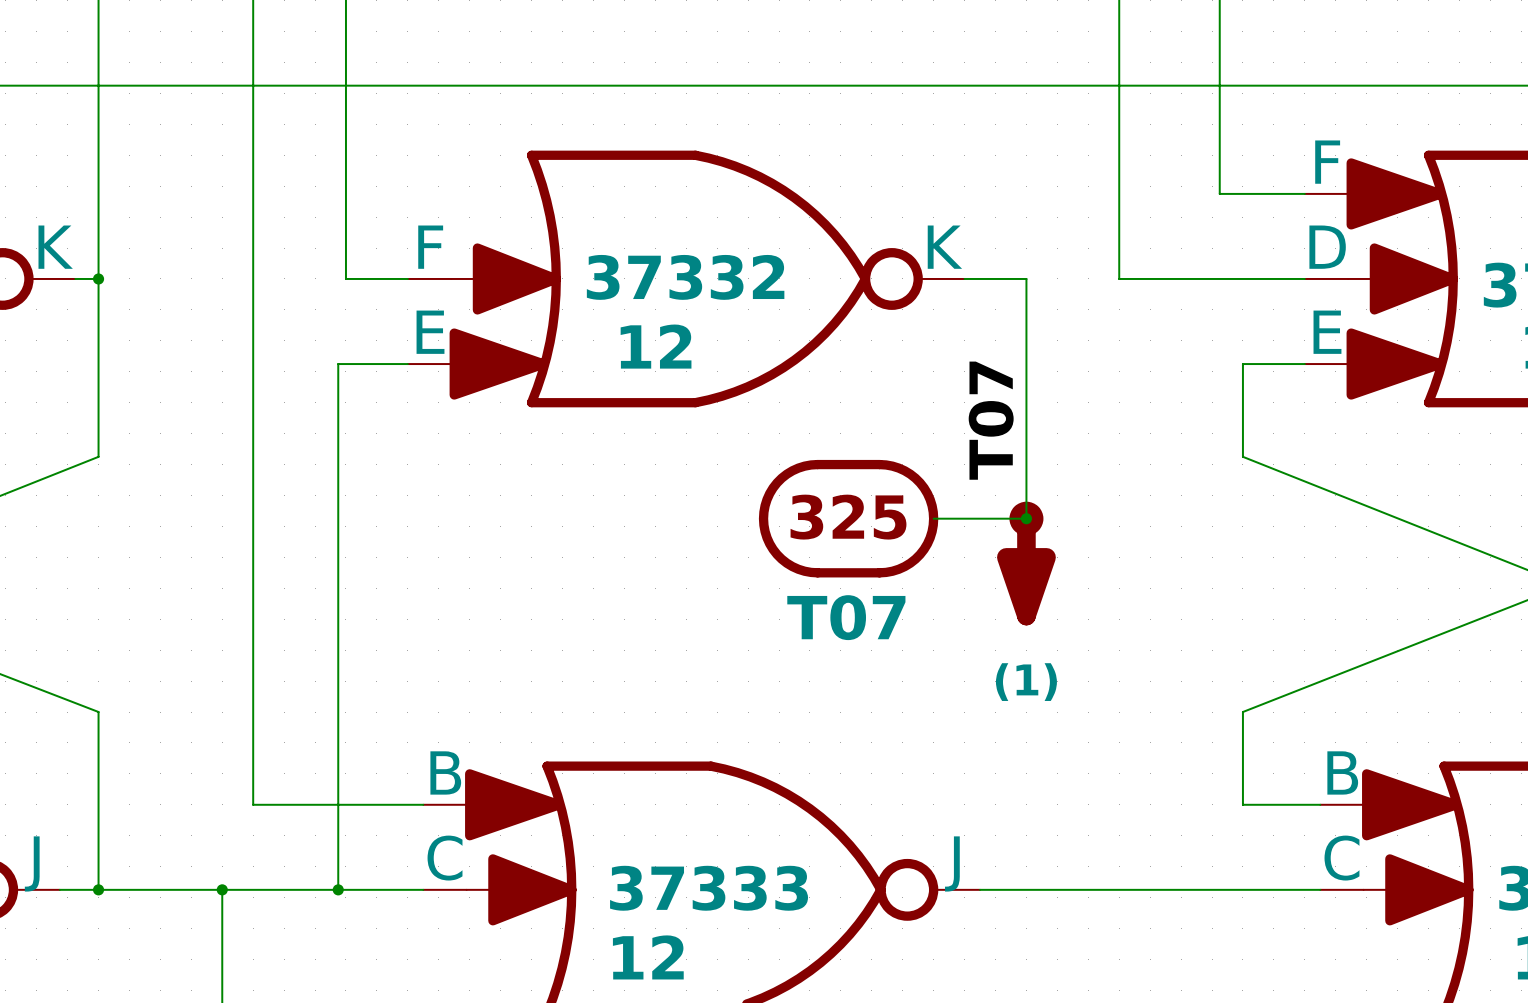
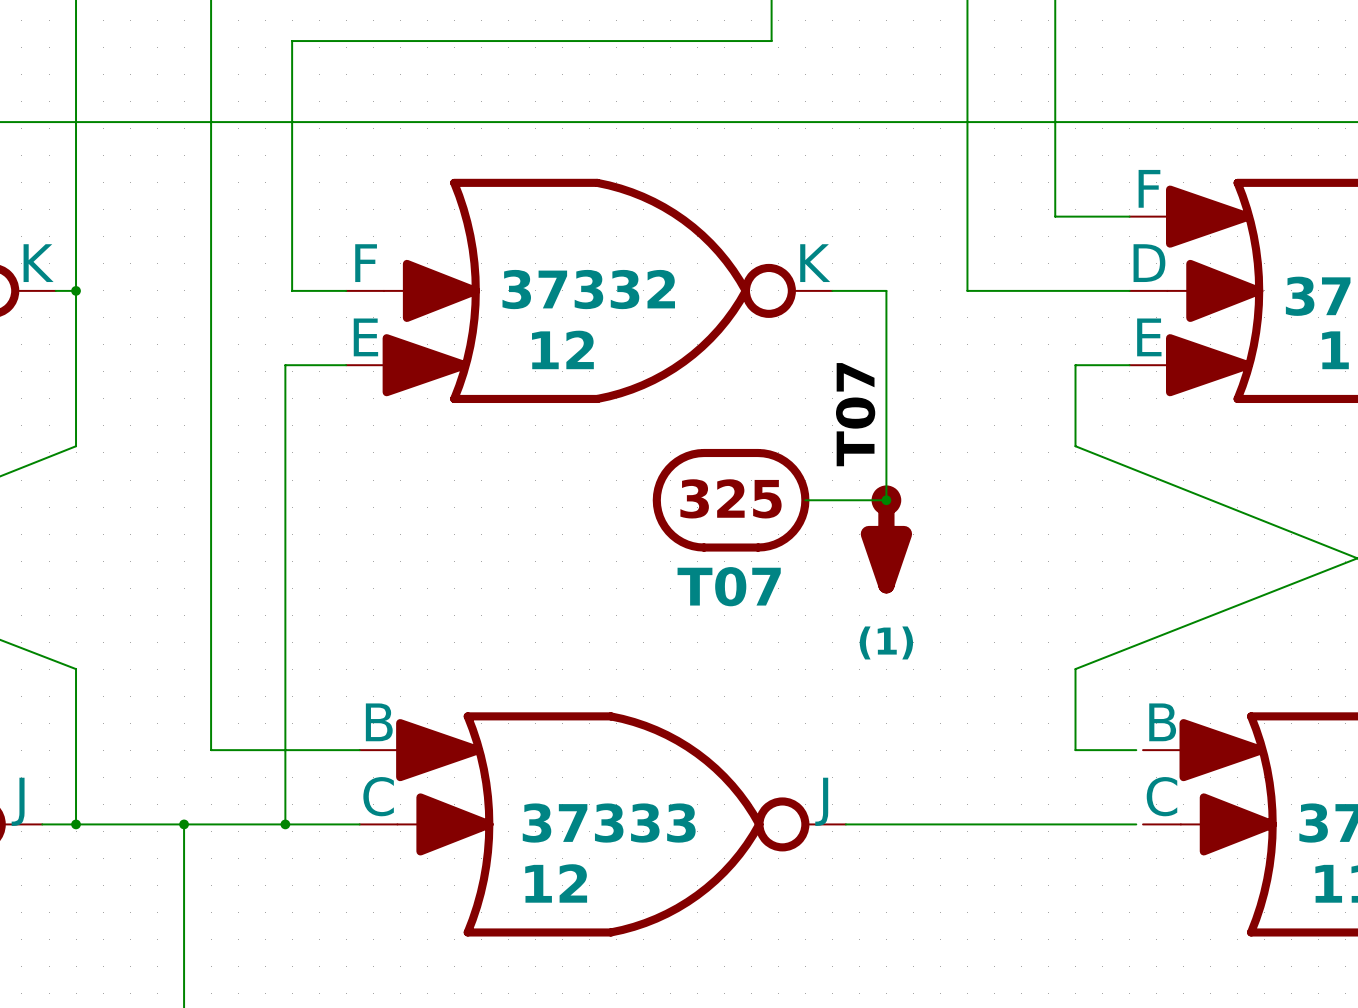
wire: (1312, 804) (1320, 804) -> none
wire: (1312, 889) (1320, 889) -> none

